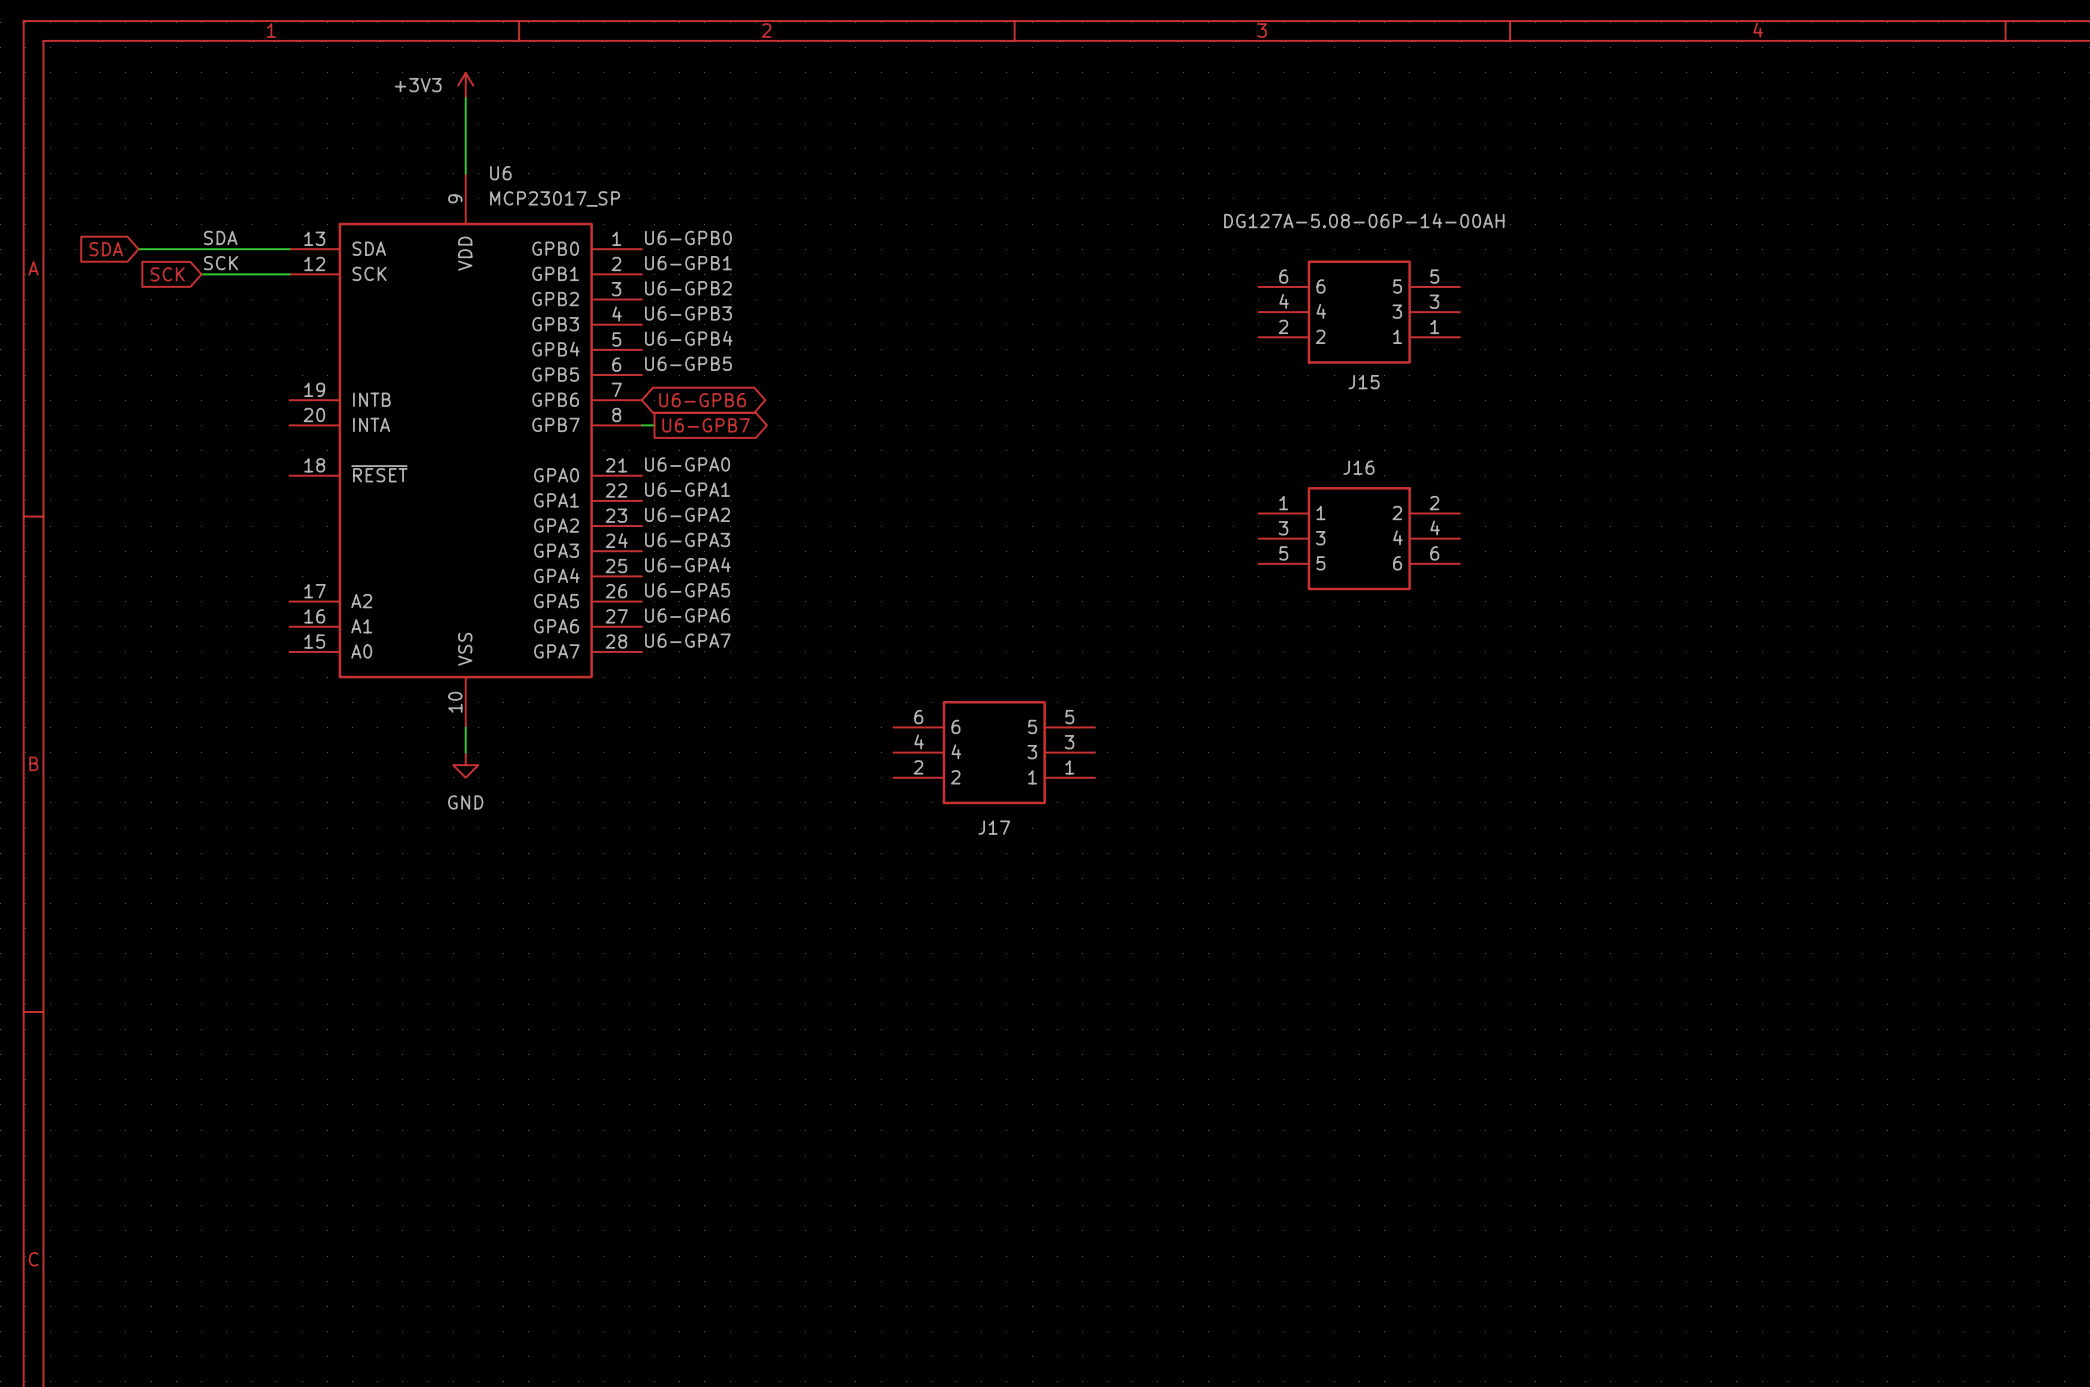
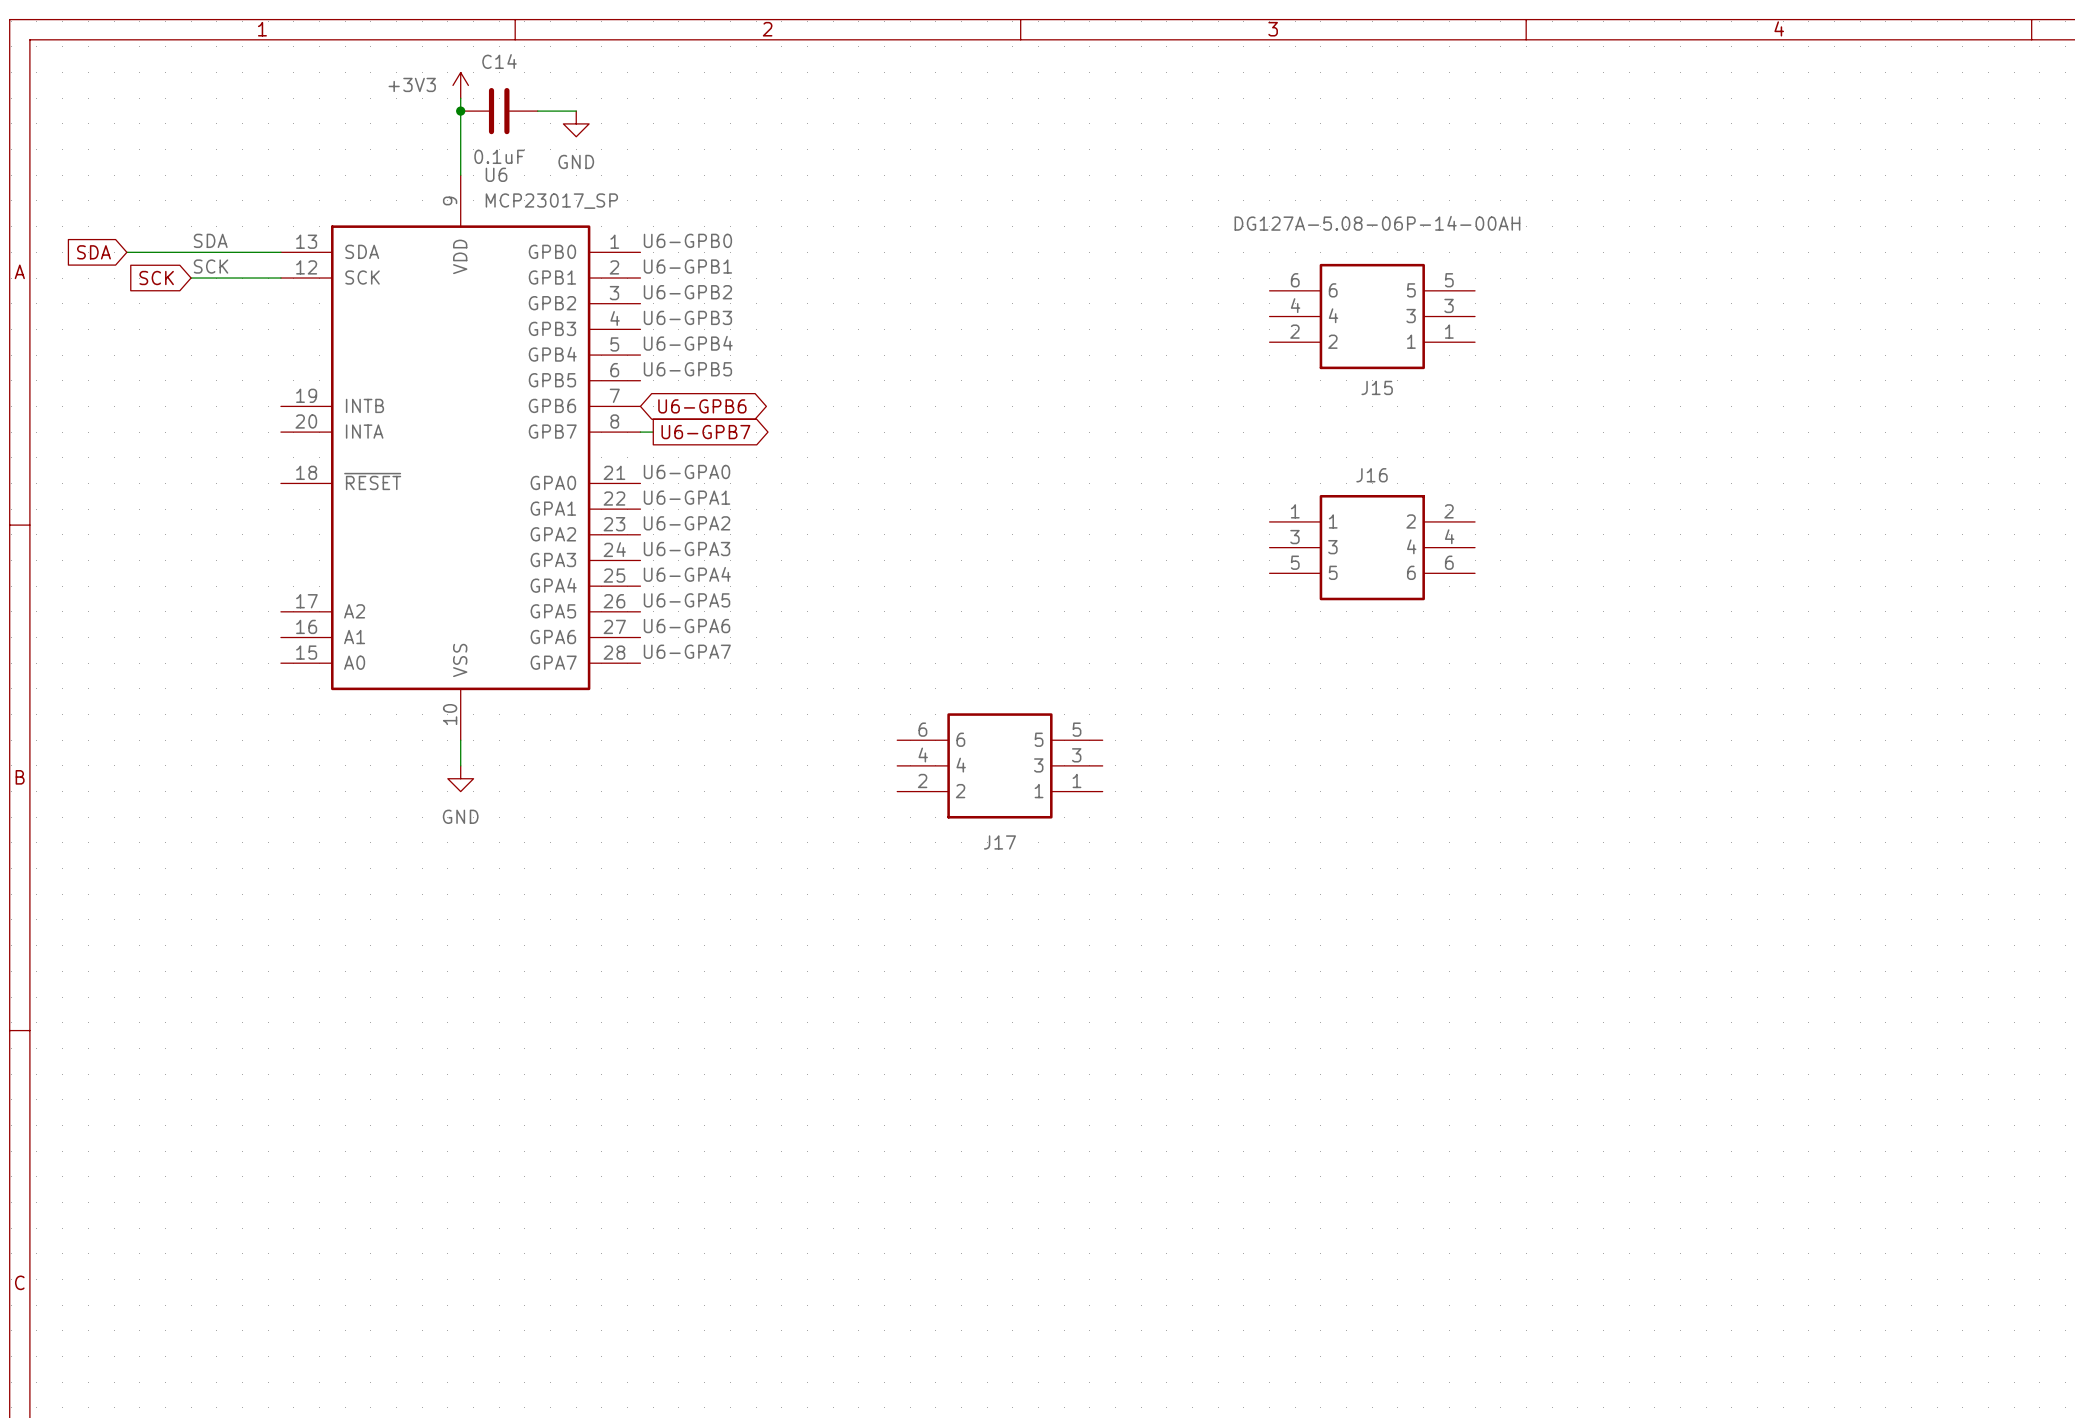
junction: none -> (460, 111)
C14: none -> 0.1uF (499, 111)
wire: none -> (537, 111) (576, 111)
power symbol: none -> GND (576, 123)

